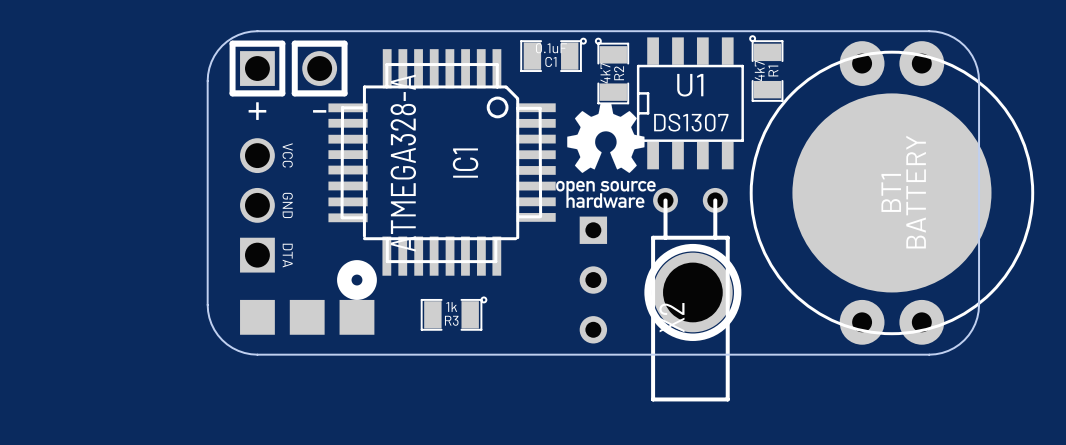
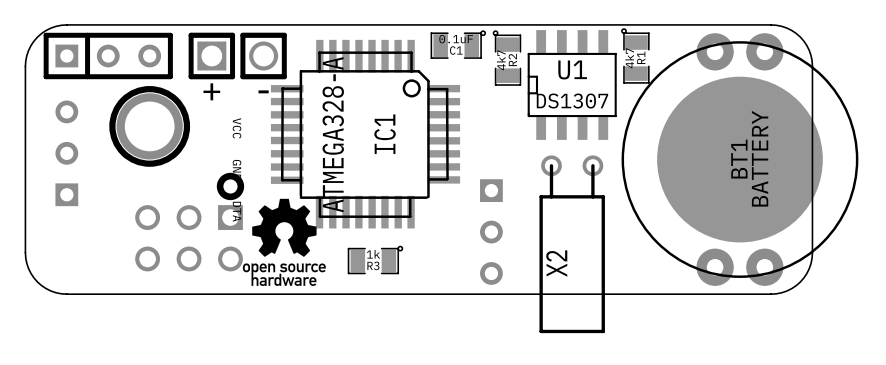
board edge: (257, 31) (238, 34) (222, 45) (211, 61) (207, 80) (208, 311) (214, 329) (227, 344) (238, 350) (257, 354) -> (211, 24) (56, 26) (41, 33) (33, 41) (28, 50) (25, 66) (25, 252) (26, 263) (33, 277) (46, 288) (61, 293) (211, 294)
part: none -> (108, 56)
part: none -> (149, 126)
drawing position: (605, 155) -> (284, 242)
part: none -> (66, 153)
part: (257, 205) -> none
part: none -> (189, 222)
part: (692, 292) -> none
part: (308, 297) -> none

